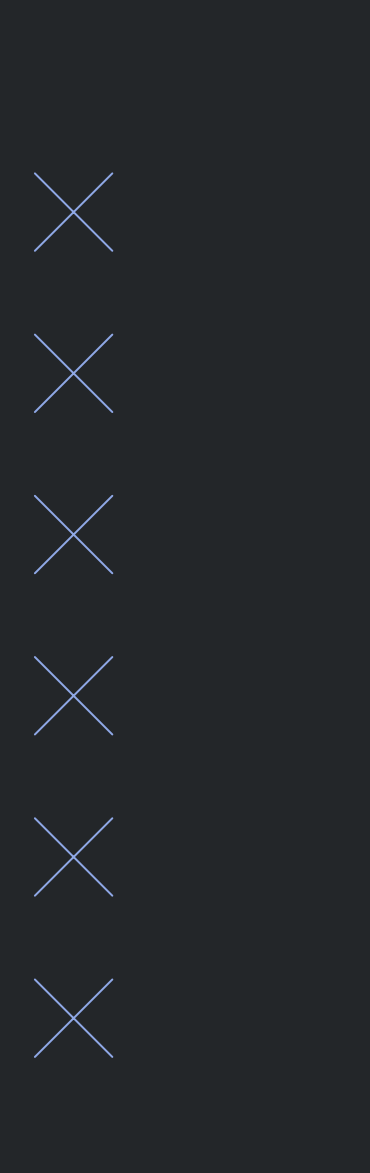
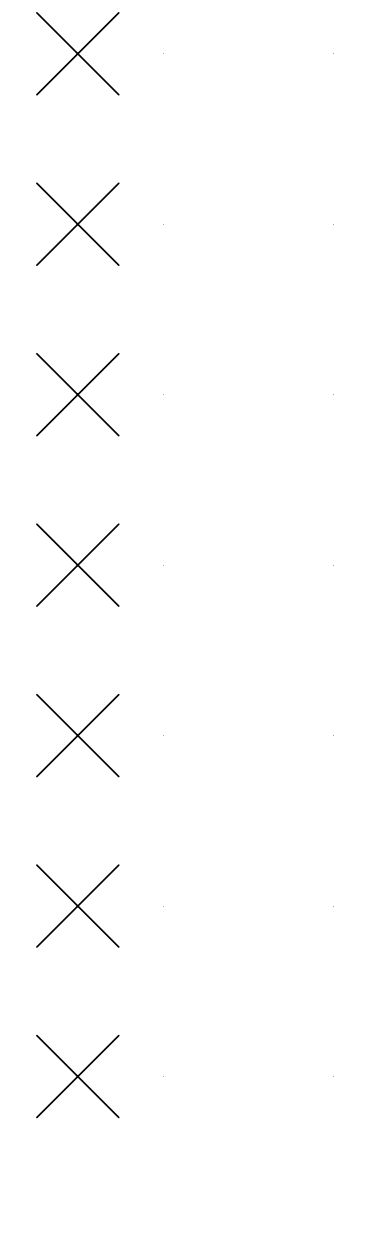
no-connect mark: none -> (77, 53)

